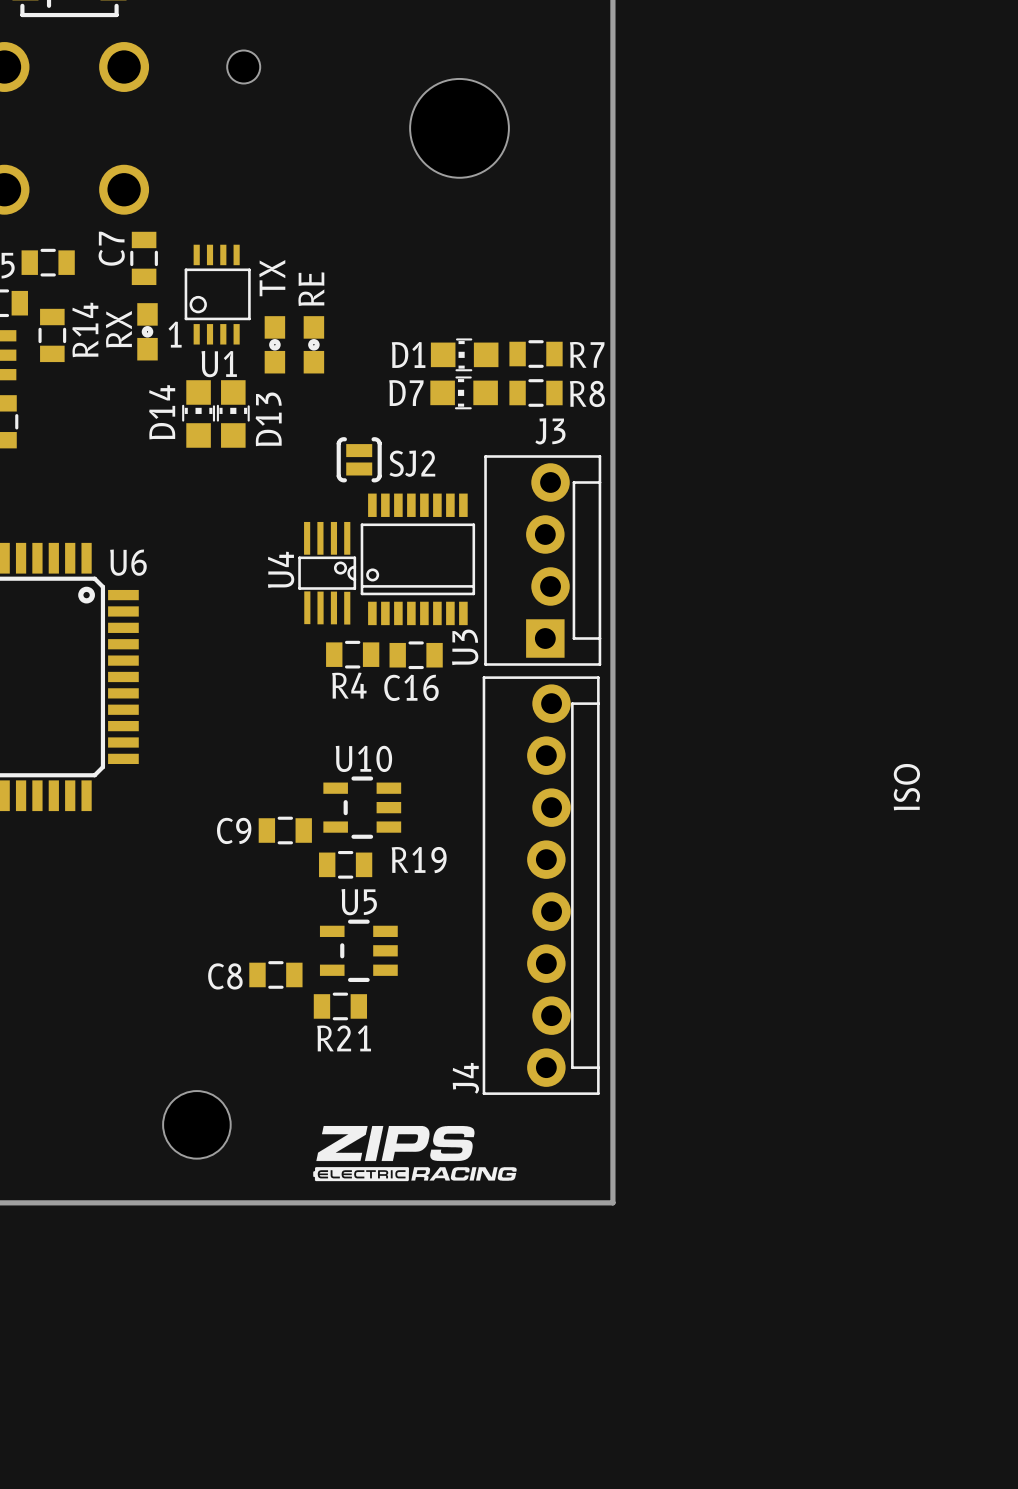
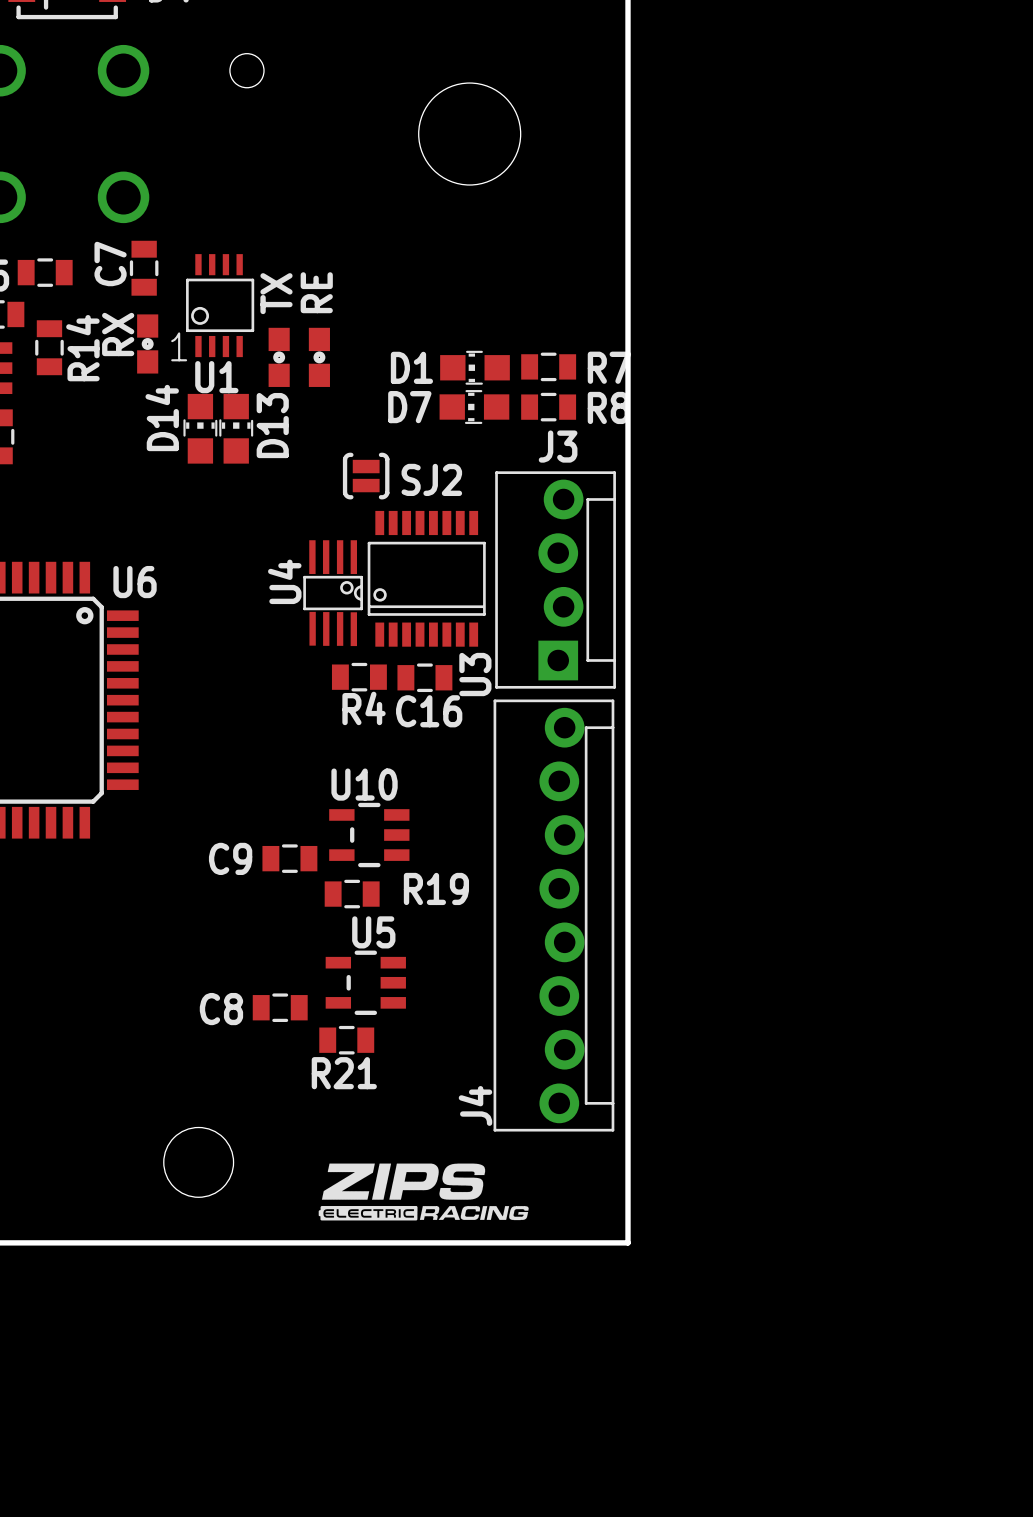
text: ISO (906, 787) -> none

